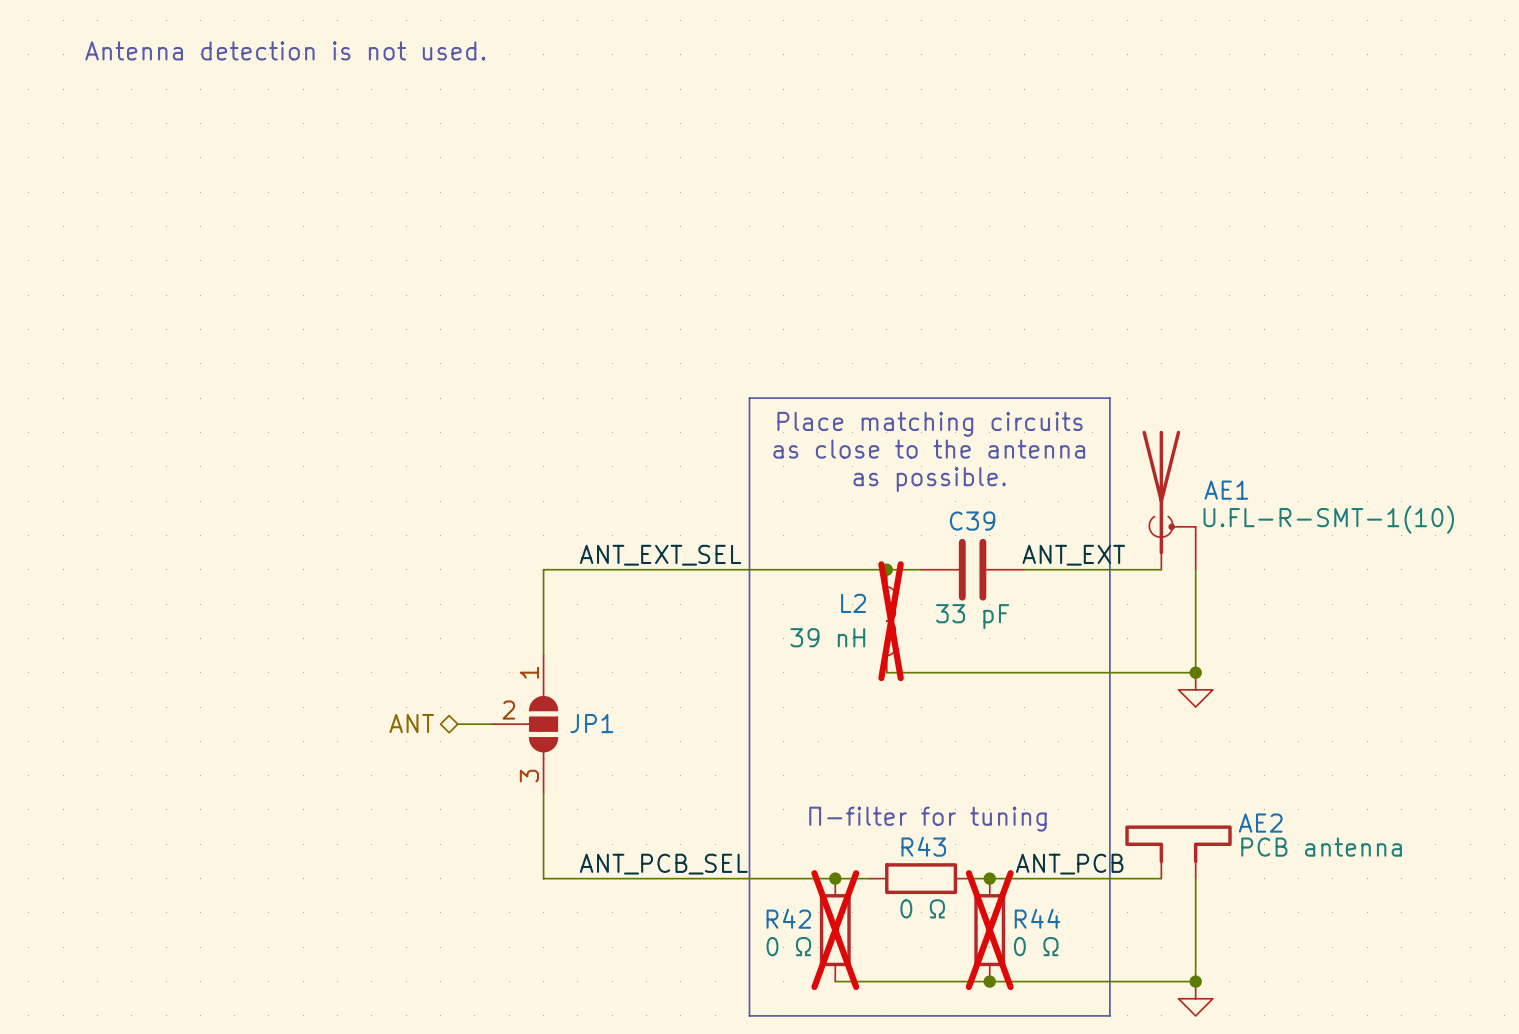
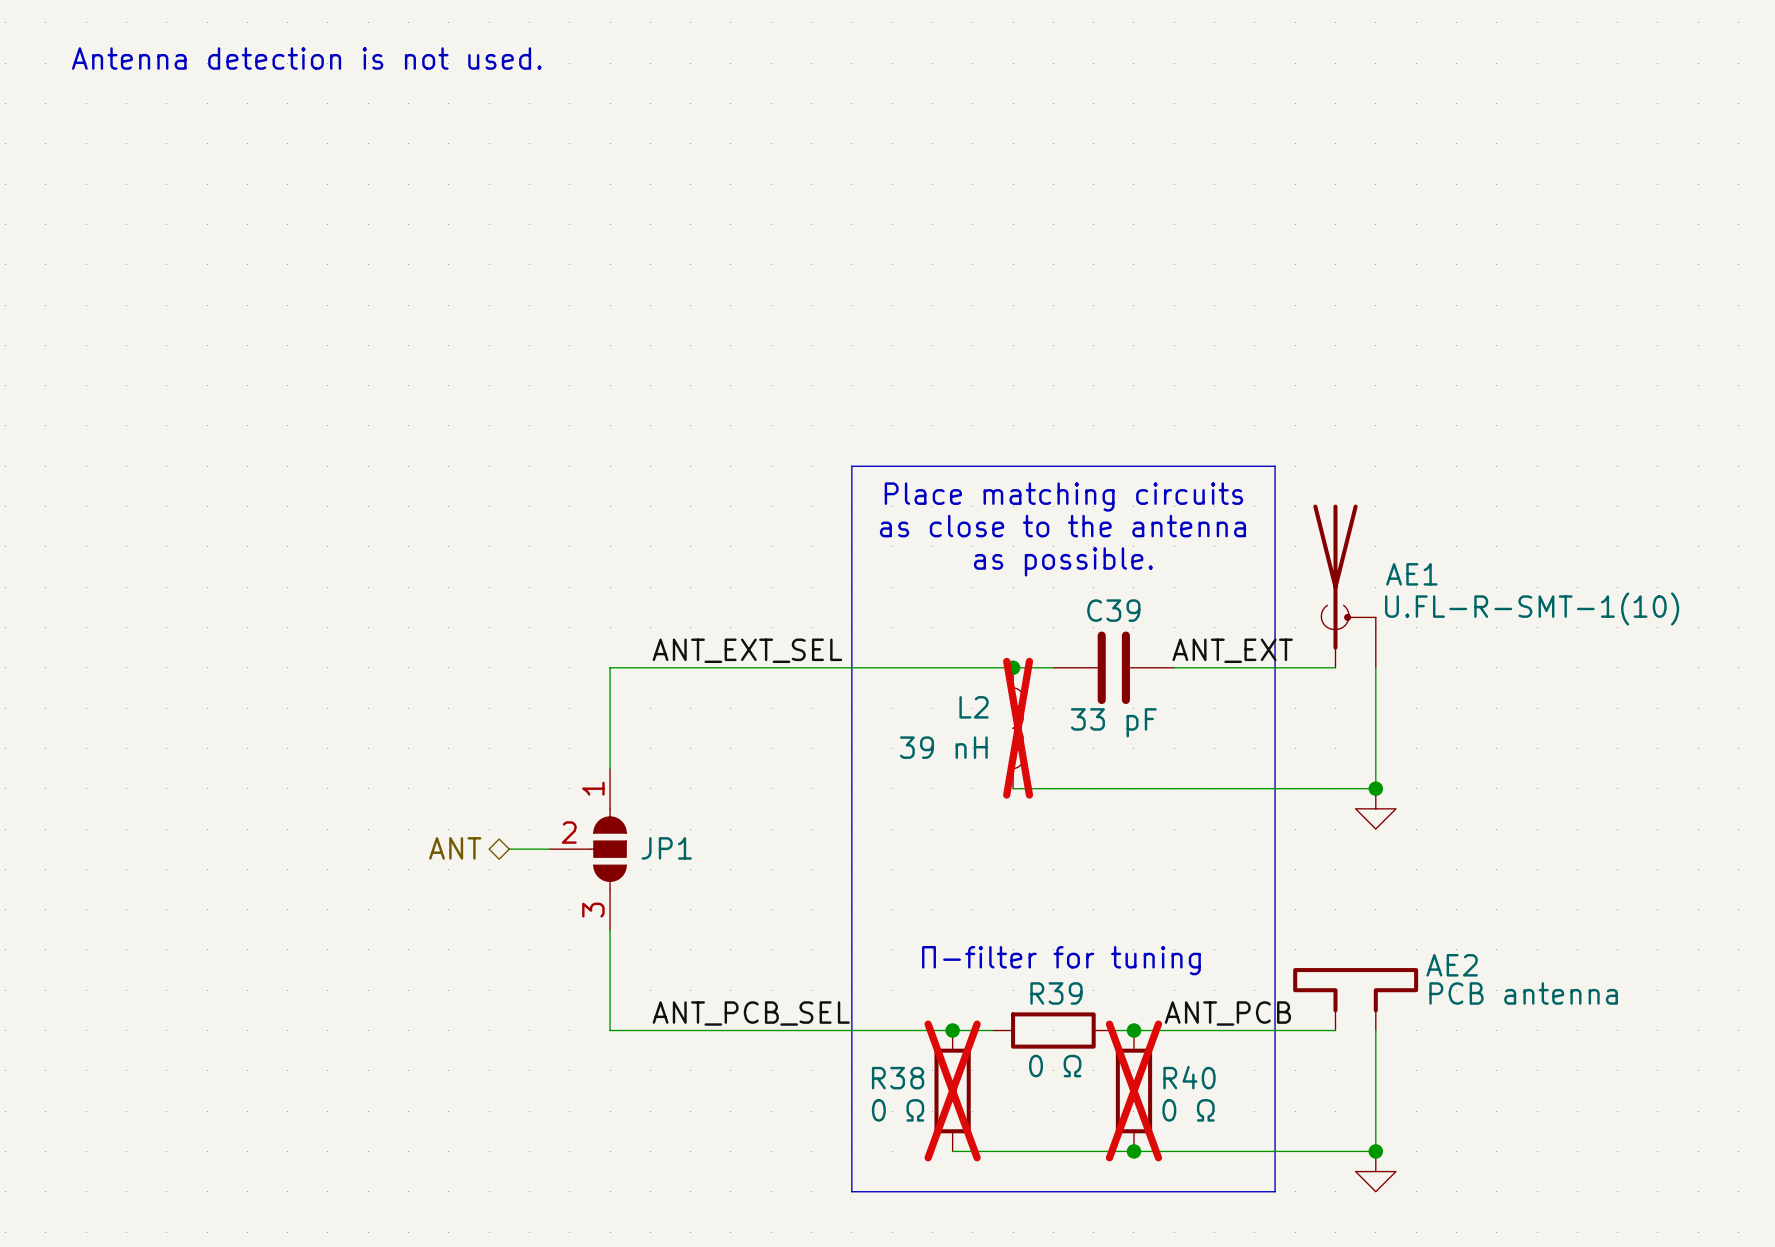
R43 name: R43 (923, 846) -> R39 (1056, 993)
R42 name: R42 (788, 918) -> R38 (898, 1078)
R44 name: R44 (1037, 918) -> R40 (1189, 1077)

